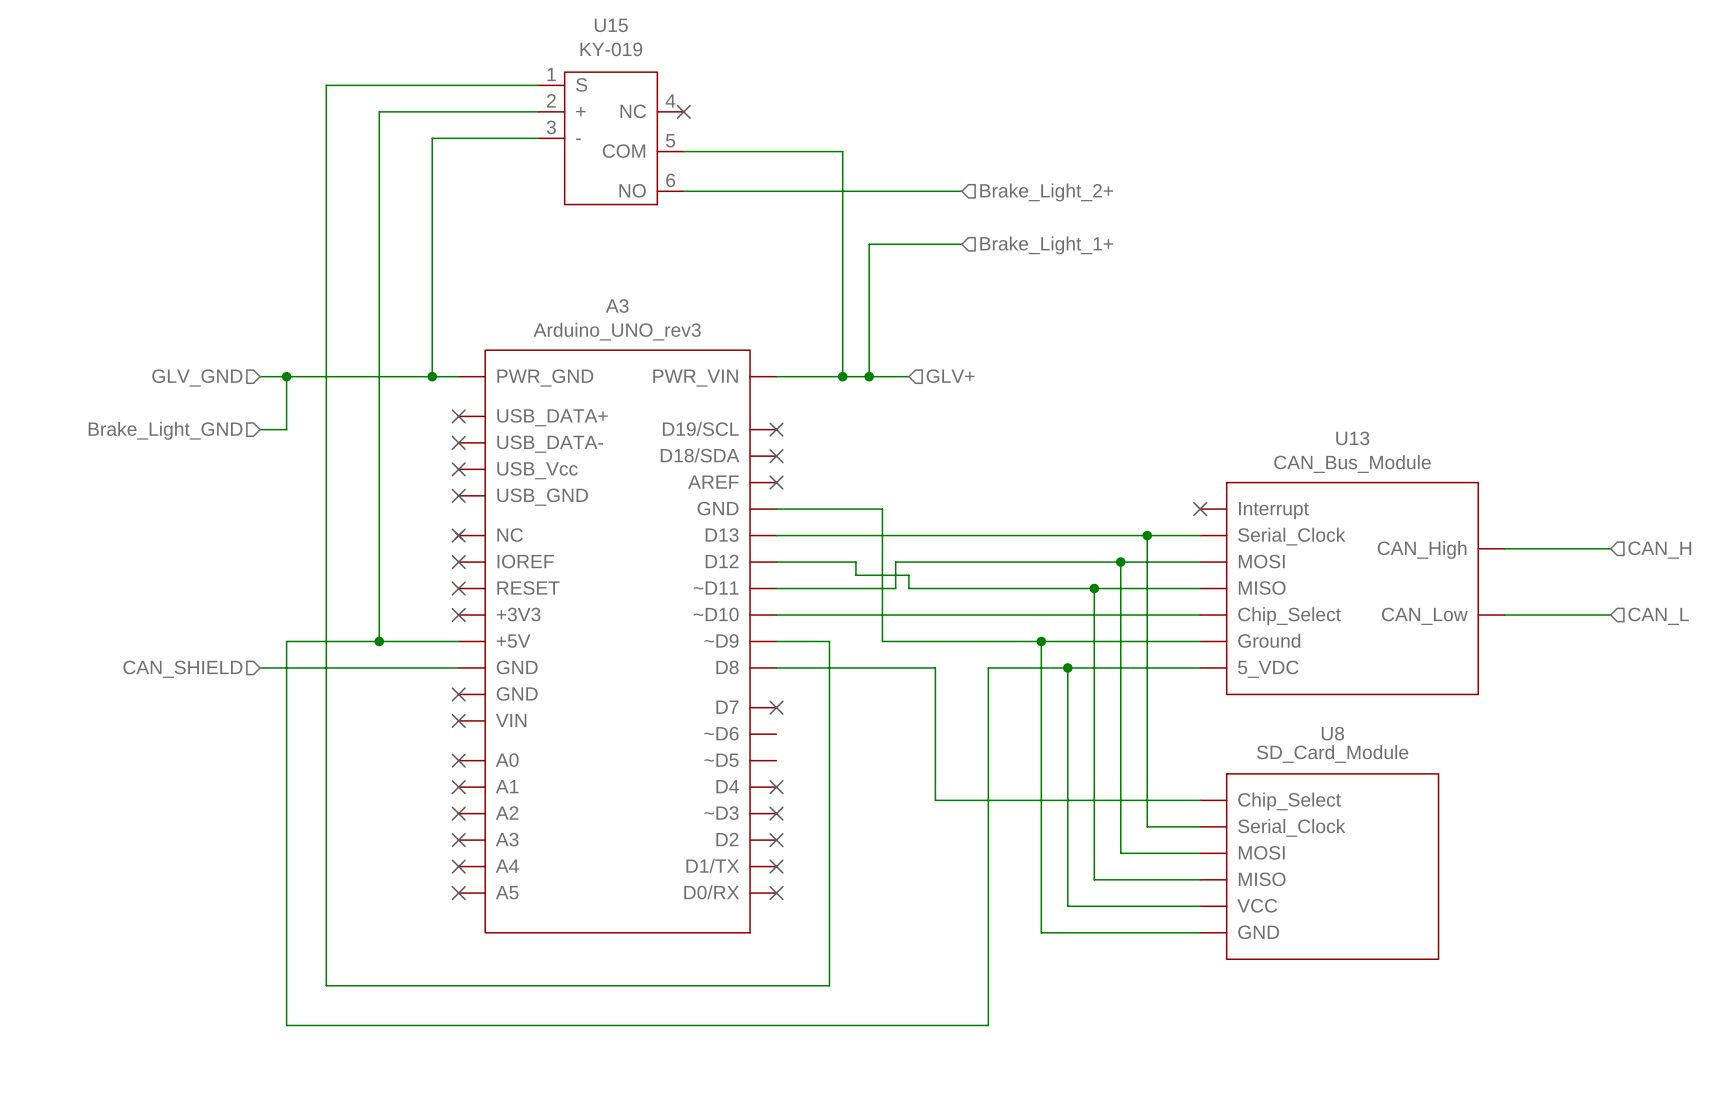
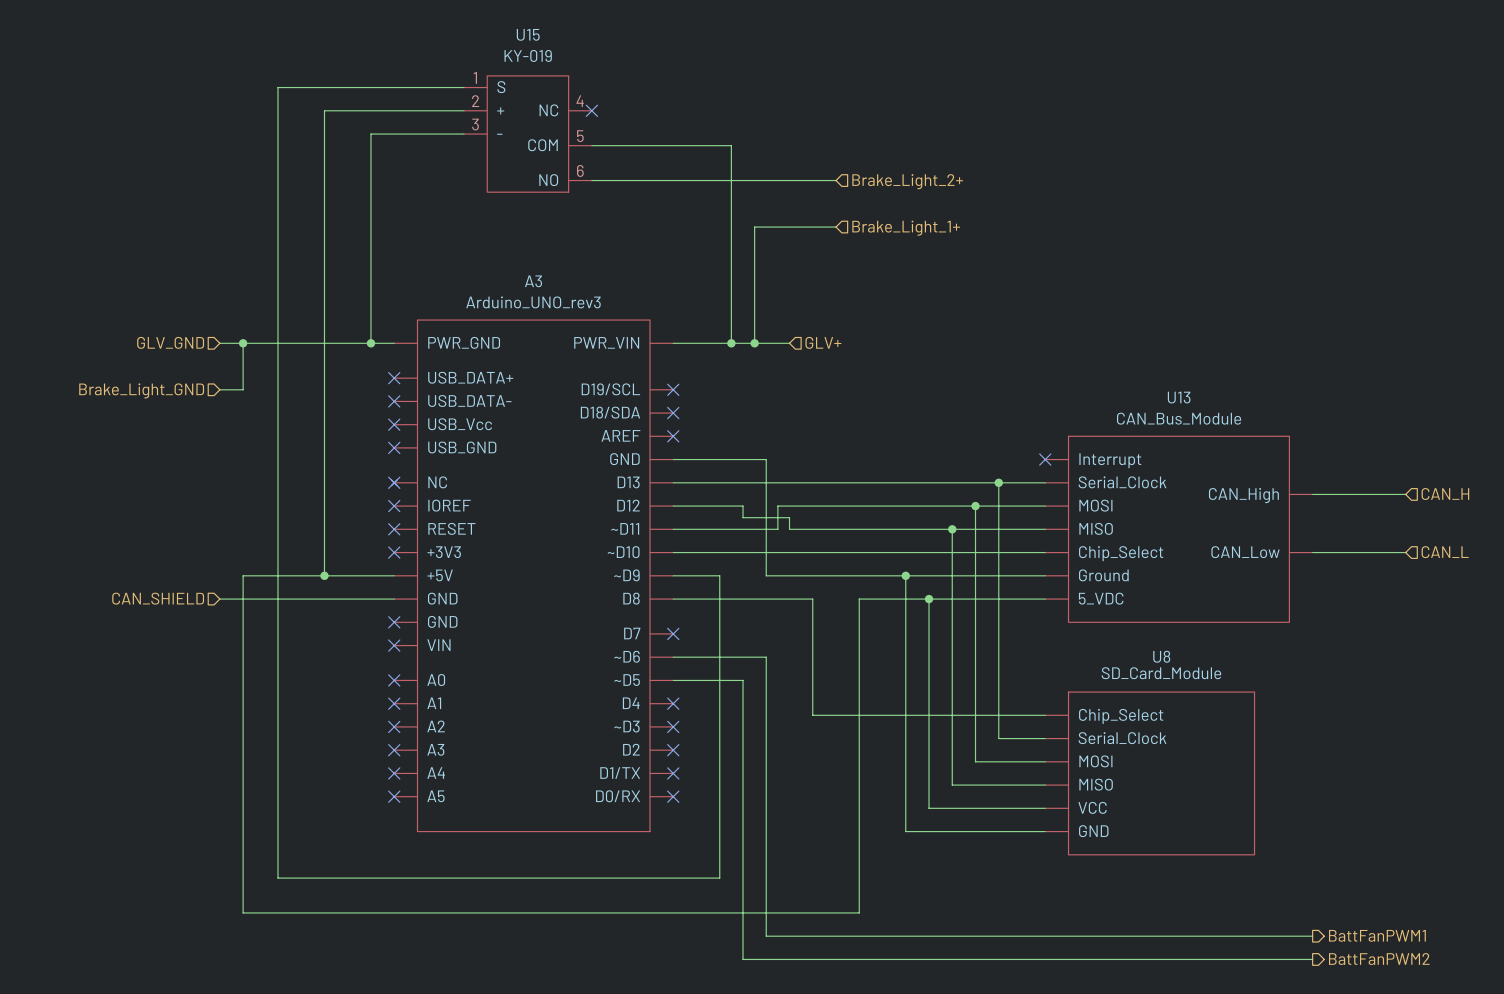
wire: none -> (673, 657) (766, 657) (766, 936) (1312, 936)
wire: none -> (673, 680) (743, 680) (743, 959) (1312, 959)
hierarchical label: none -> BattFanPWM1 (1377, 935)
hierarchical label: none -> BattFanPWM2 (1379, 959)

